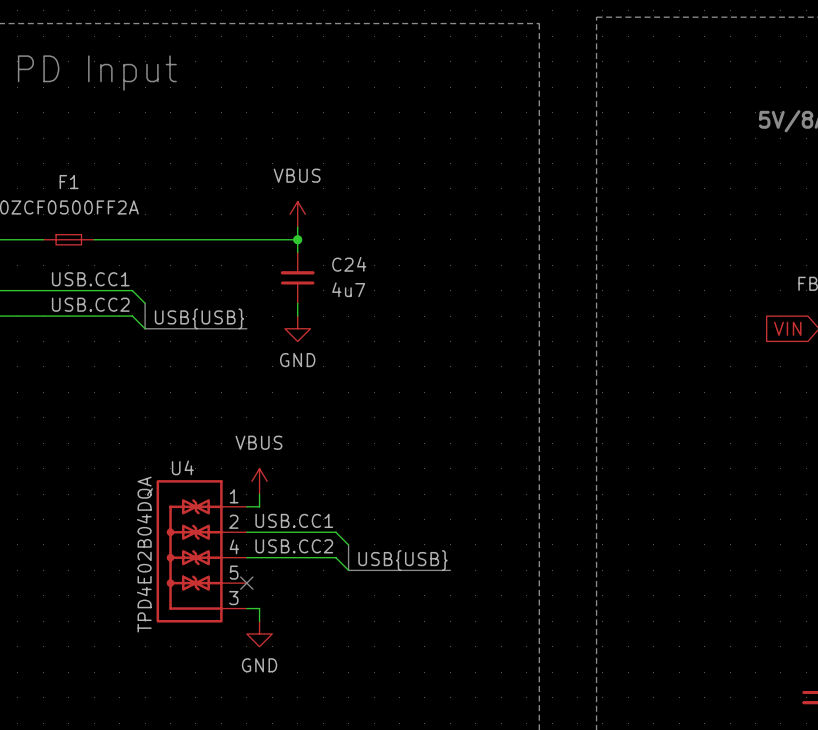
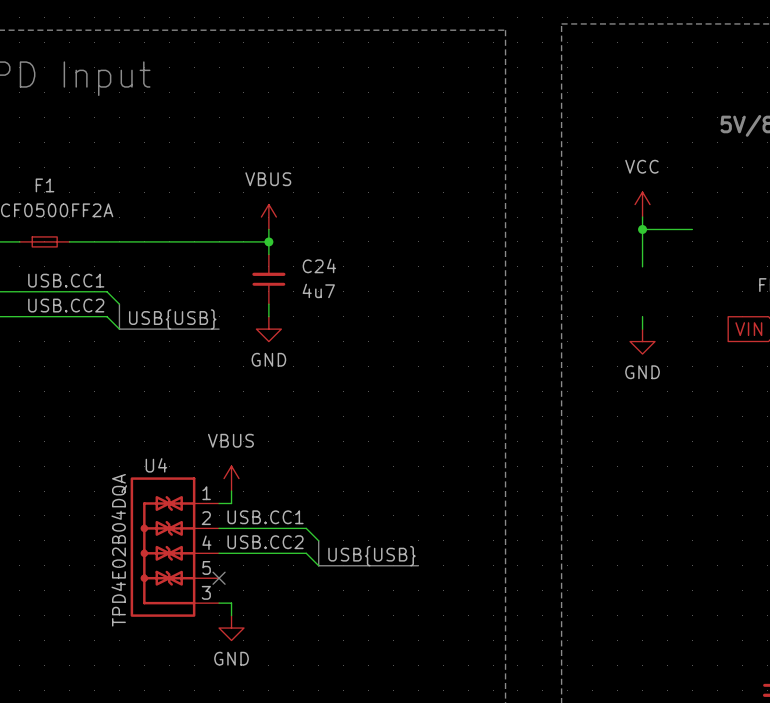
power symbol: none -> VCC (642, 204)
wire: none -> (642, 217) (642, 266)
wire: none -> (642, 229) (692, 229)
junction: none -> (642, 229)
wire: none -> (642, 316) (642, 329)
power symbol: none -> GND (642, 341)

